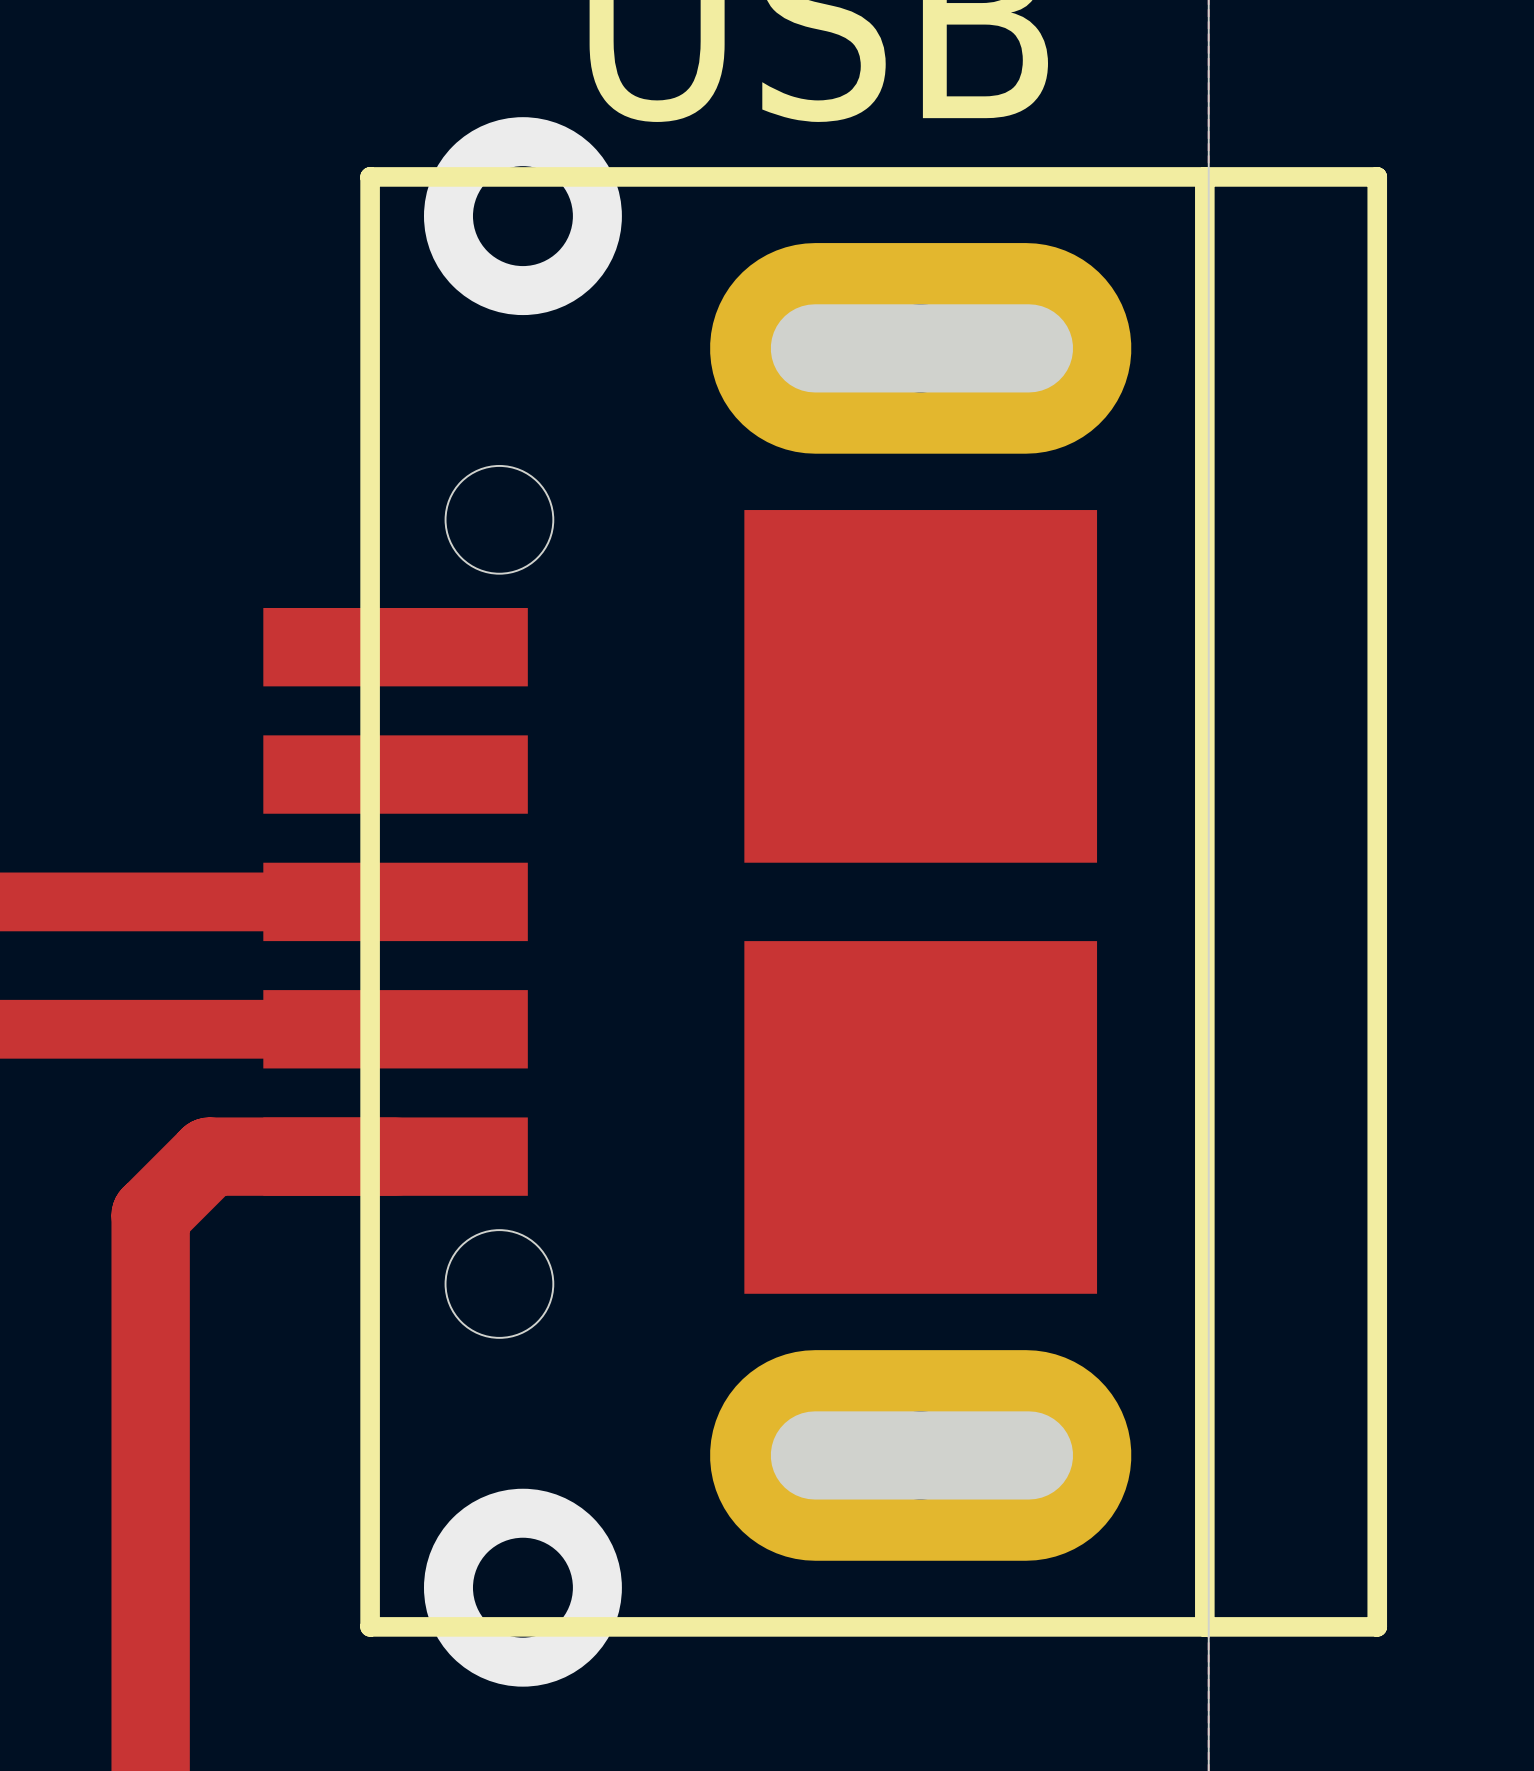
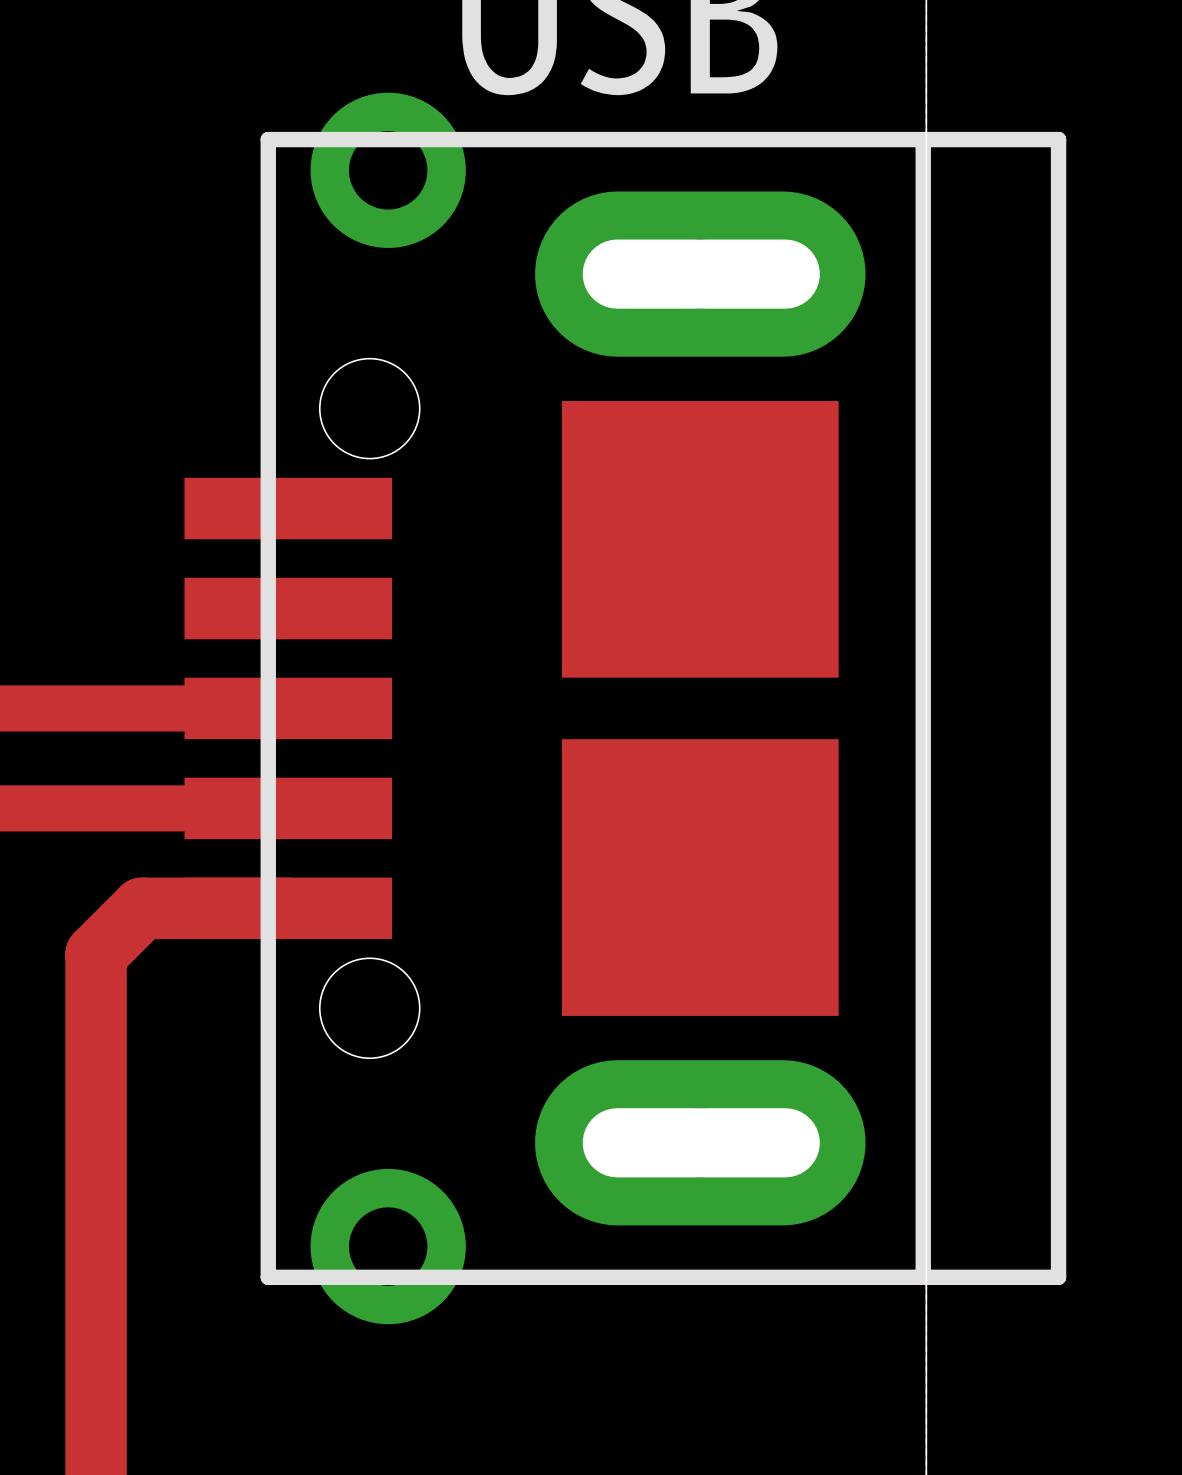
part footprint: [263, 167, 1388, 1637] -> [184, 131, 1067, 1286]

